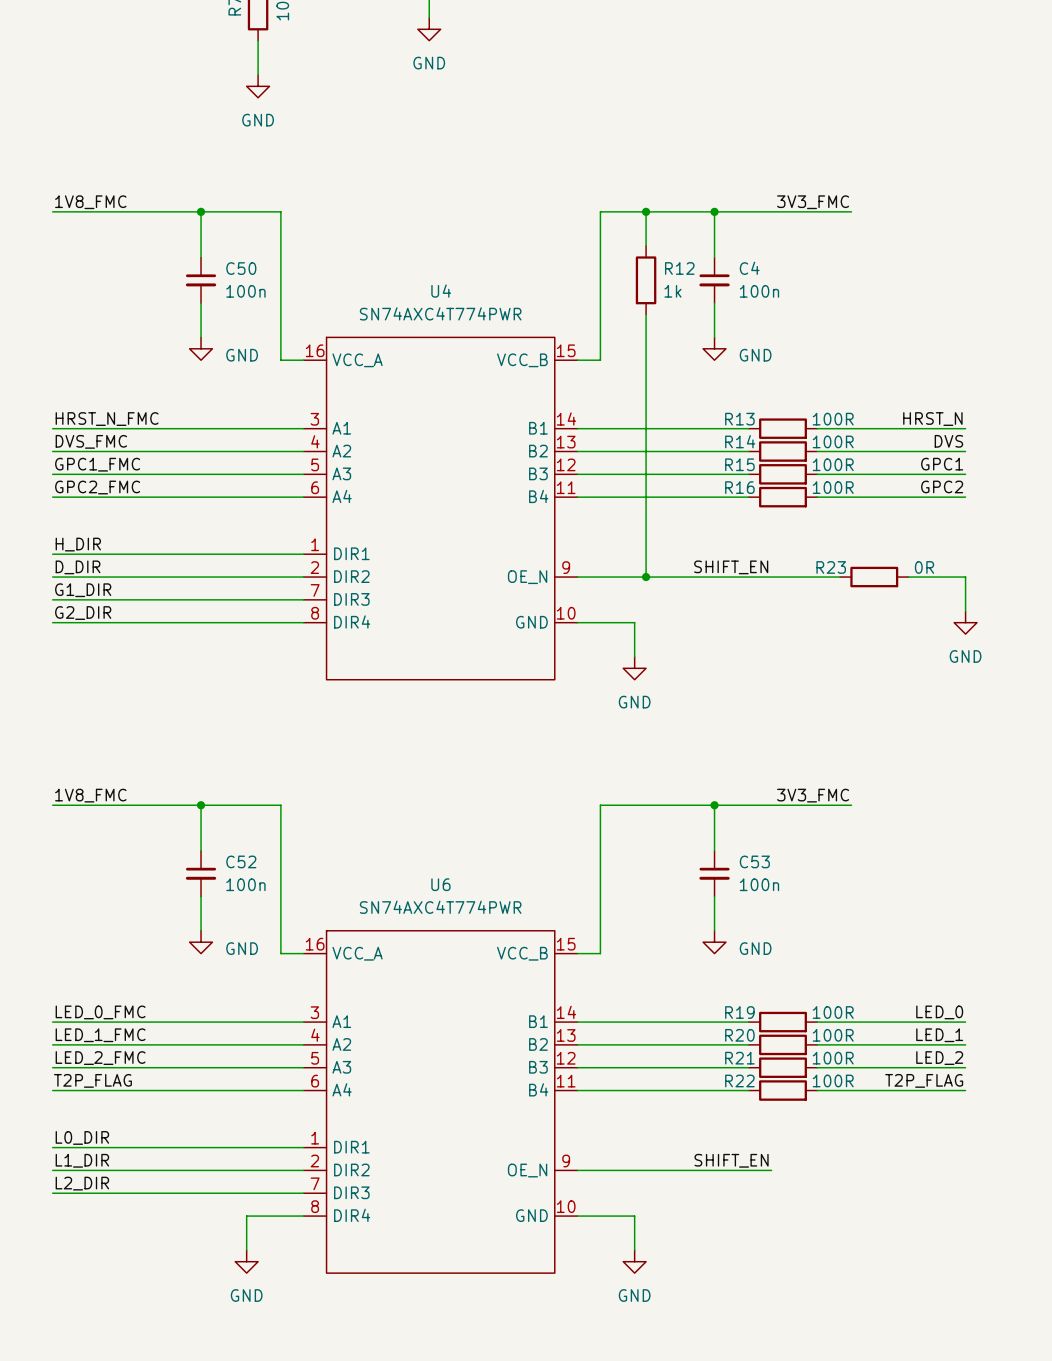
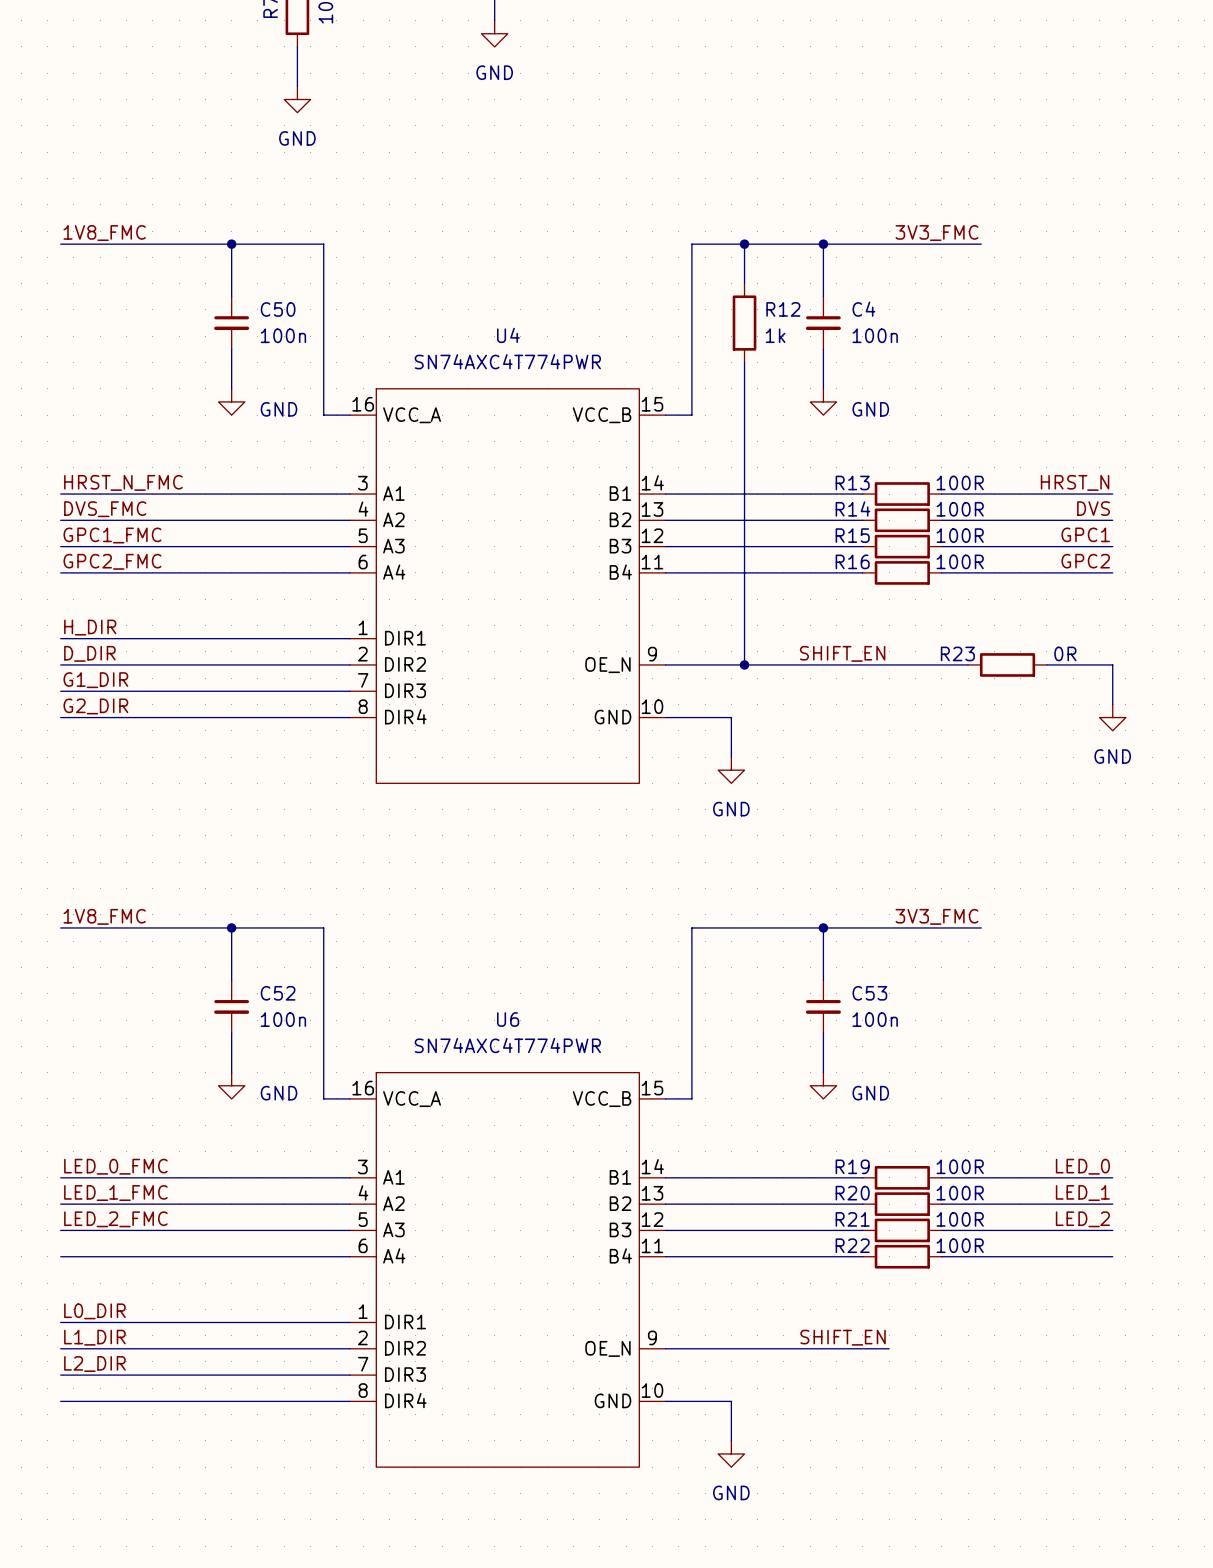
label: T2P_FLAG (92, 1080) -> none
label: T2P_FLAG (924, 1080) -> none
wire: (246, 1216) (246, 1250) -> (284, 1401) (60, 1401)
power symbol: GND (246, 1261) -> none

